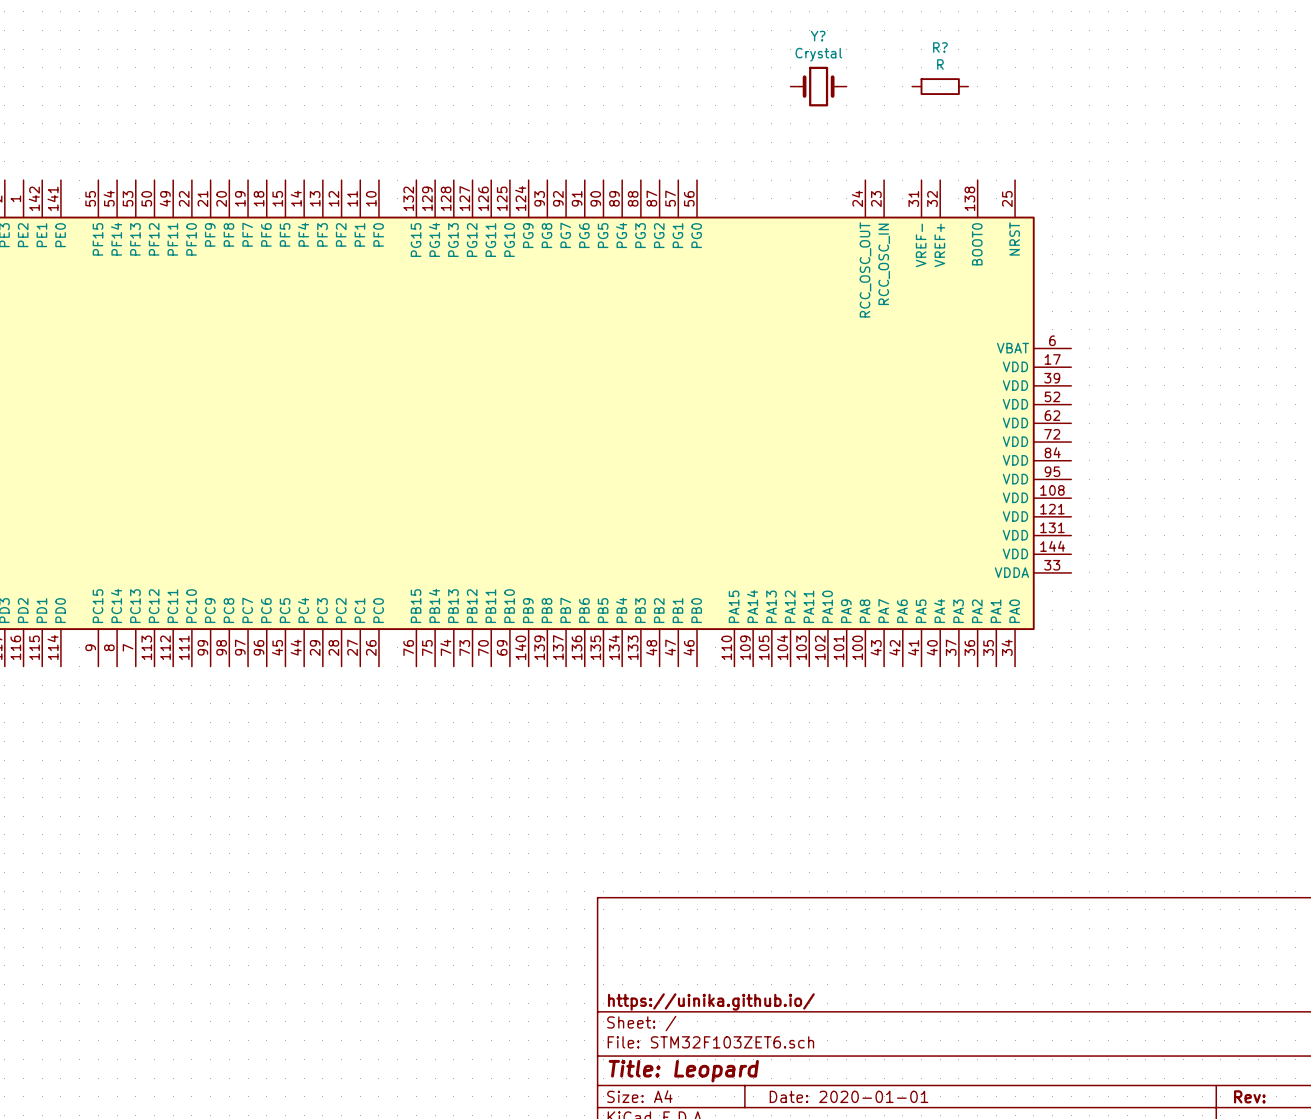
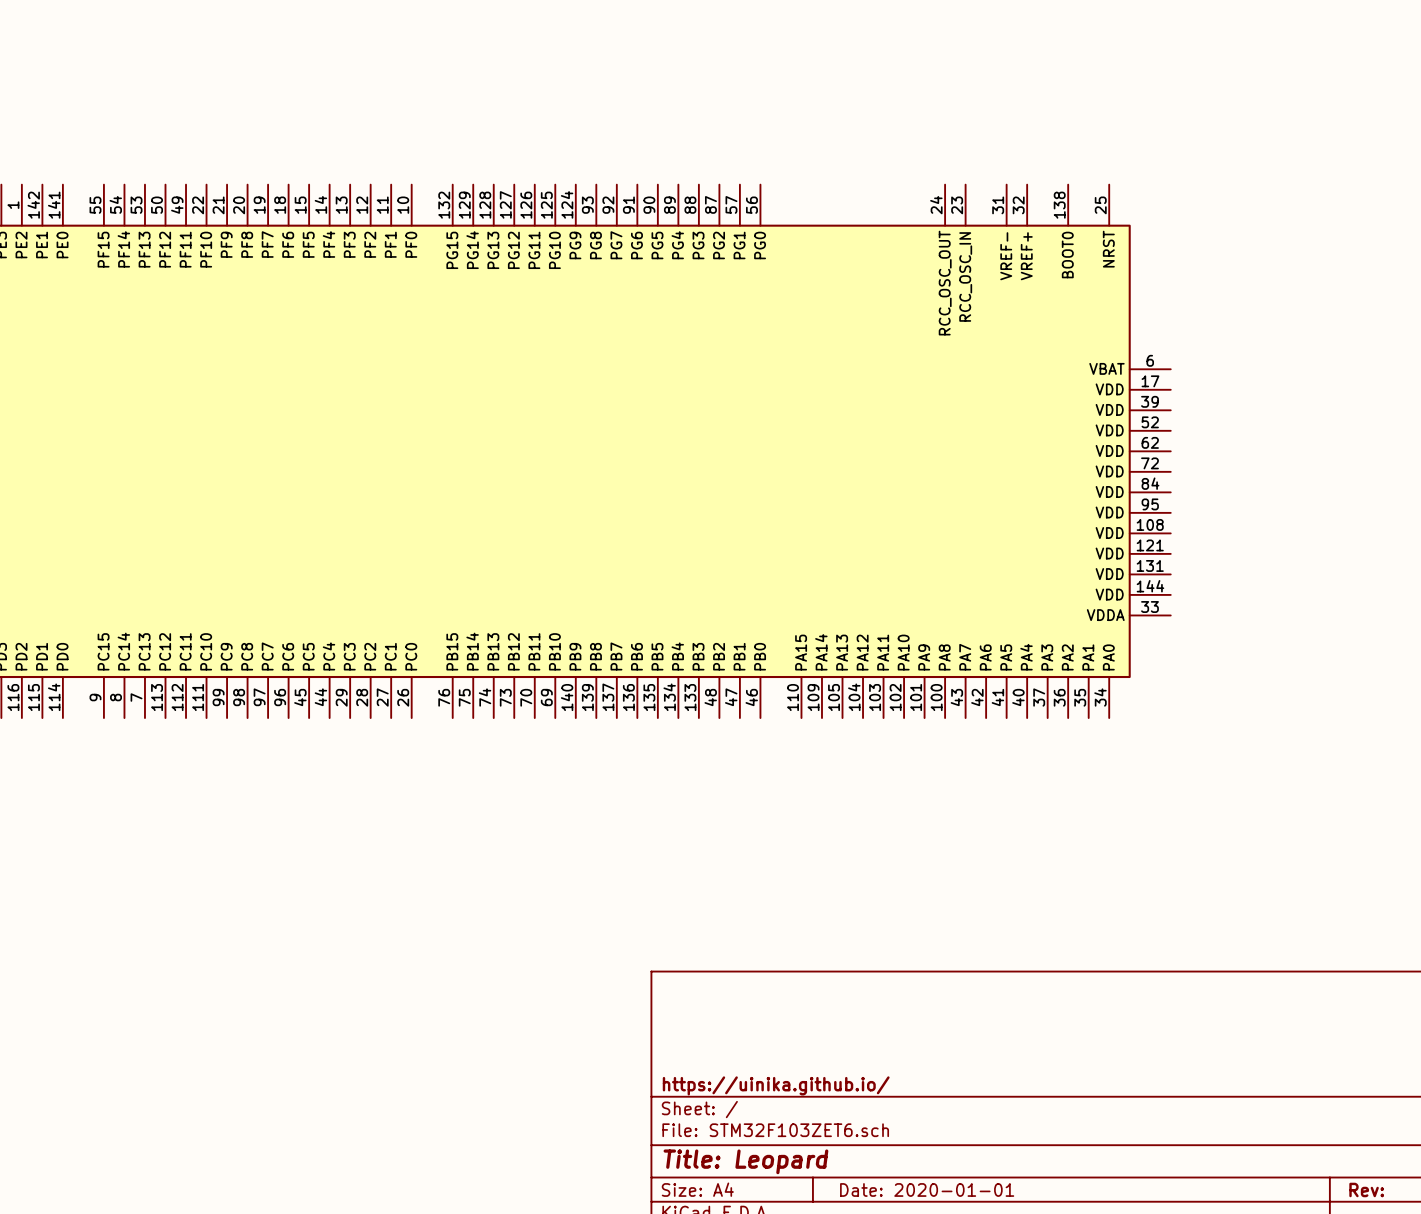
Y?: Crystal (818, 86) -> none
R?: R (940, 86) -> none

